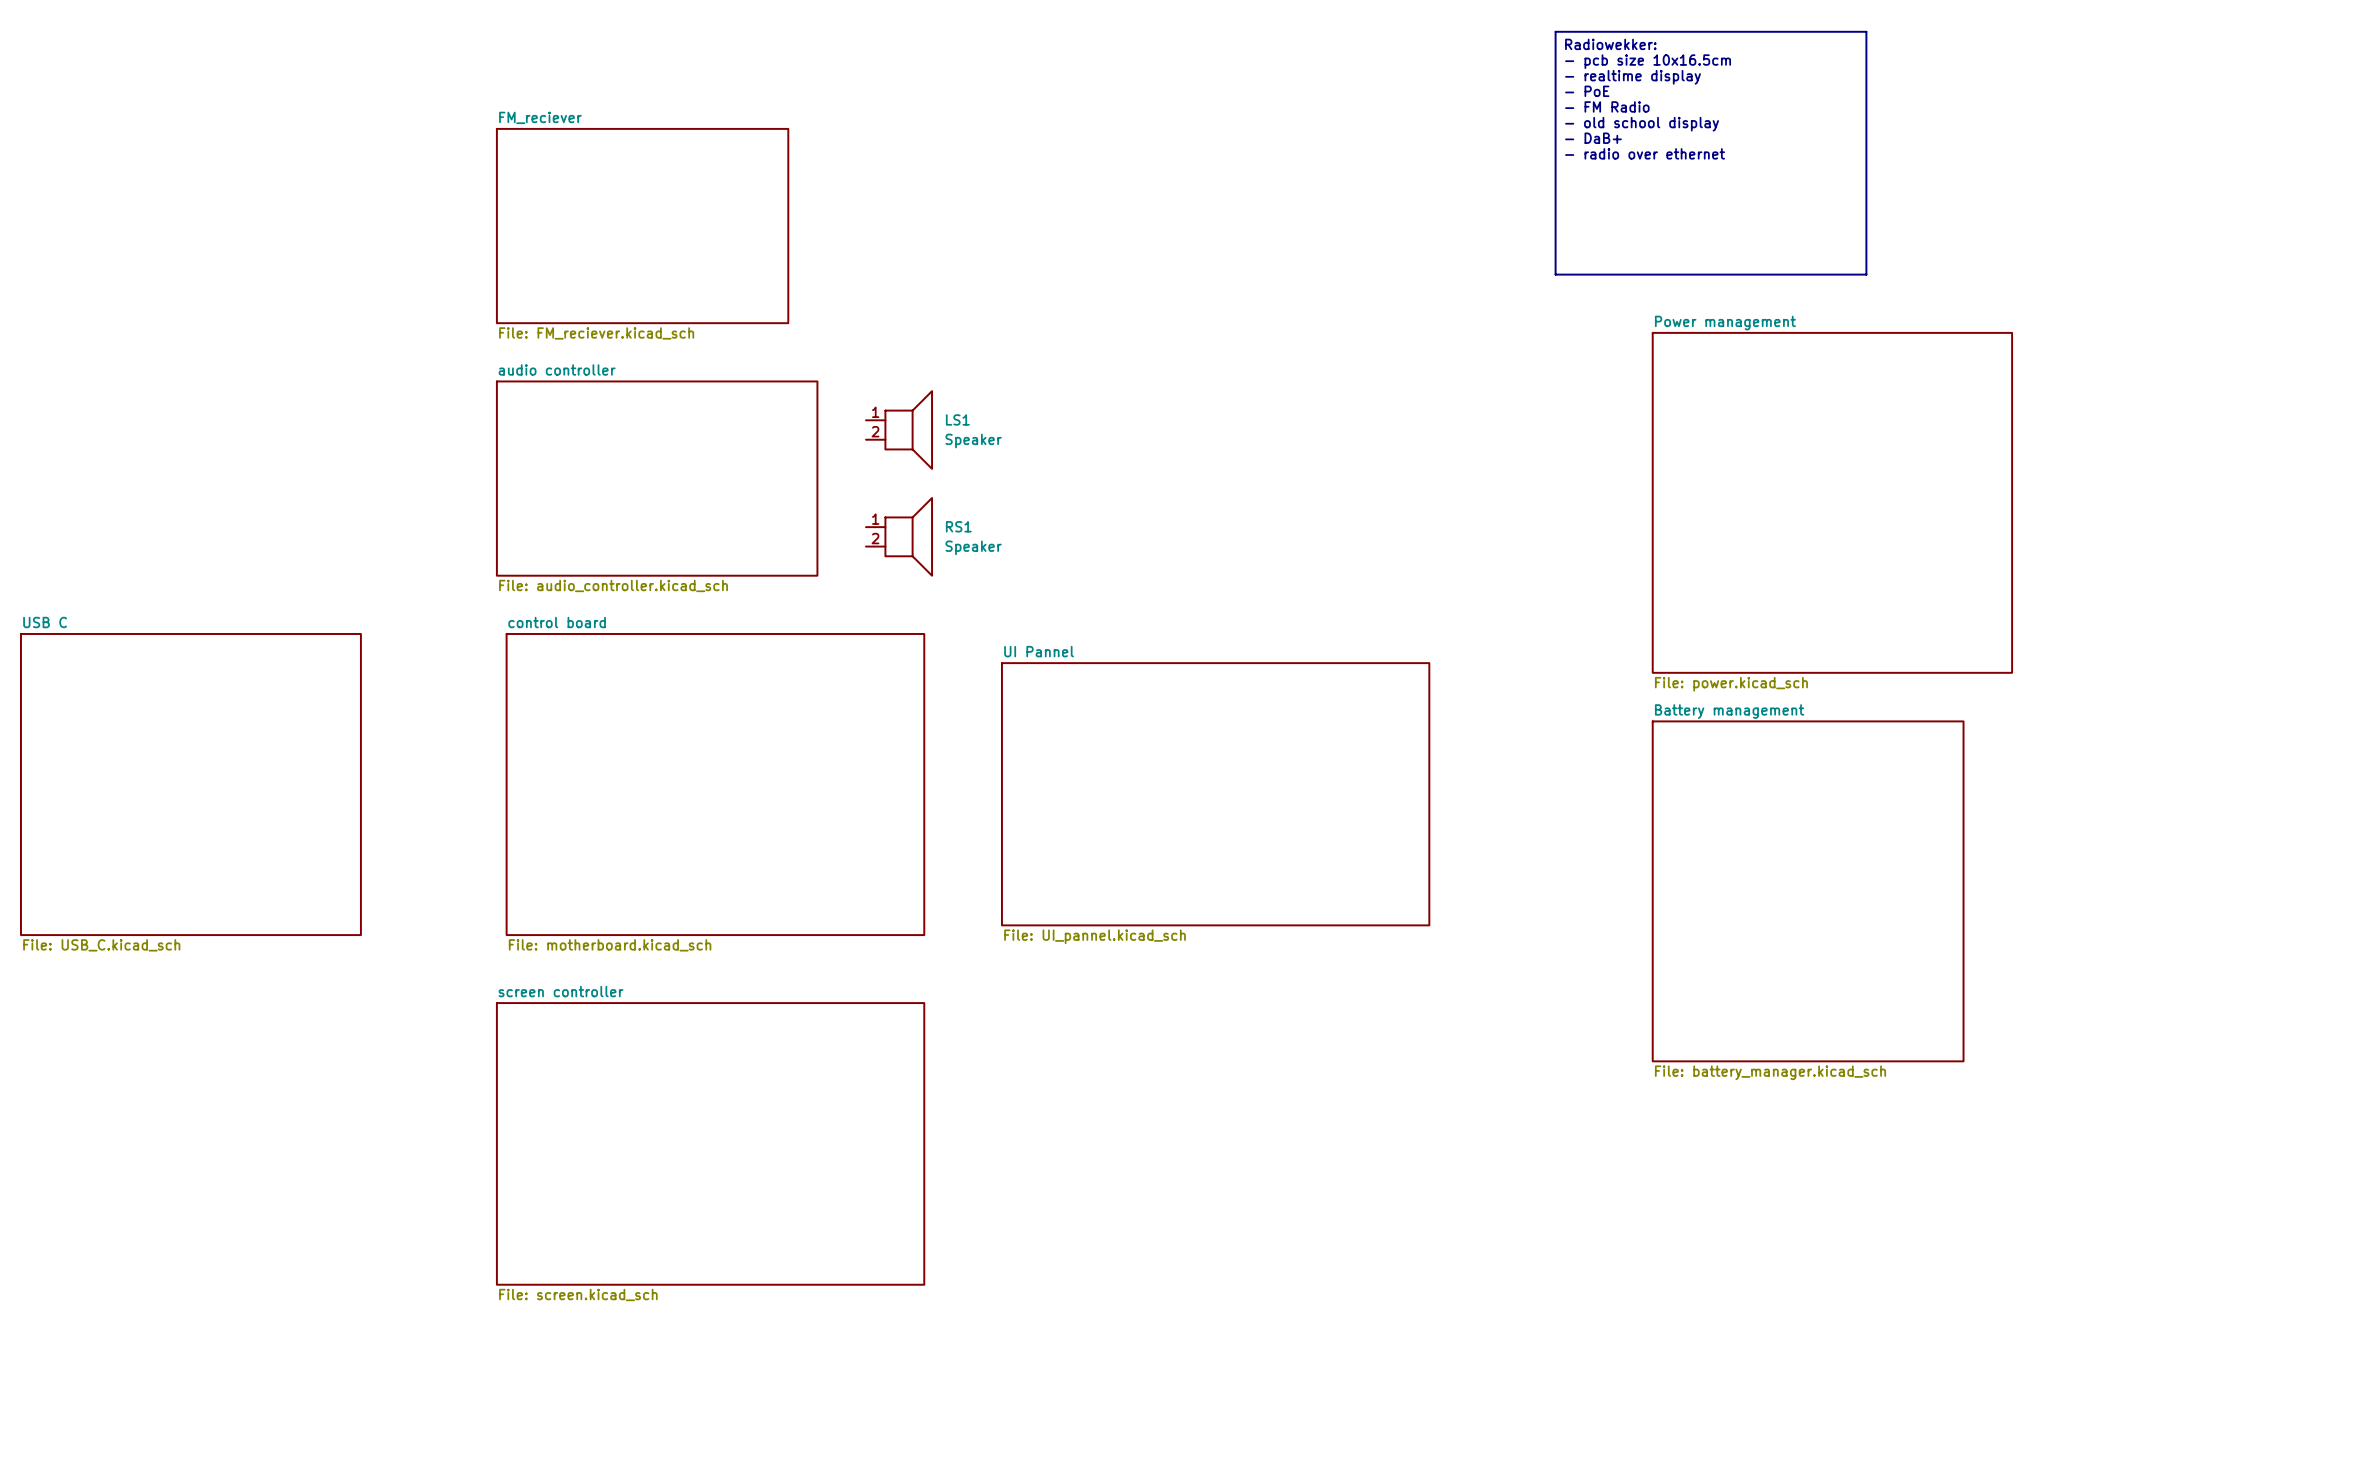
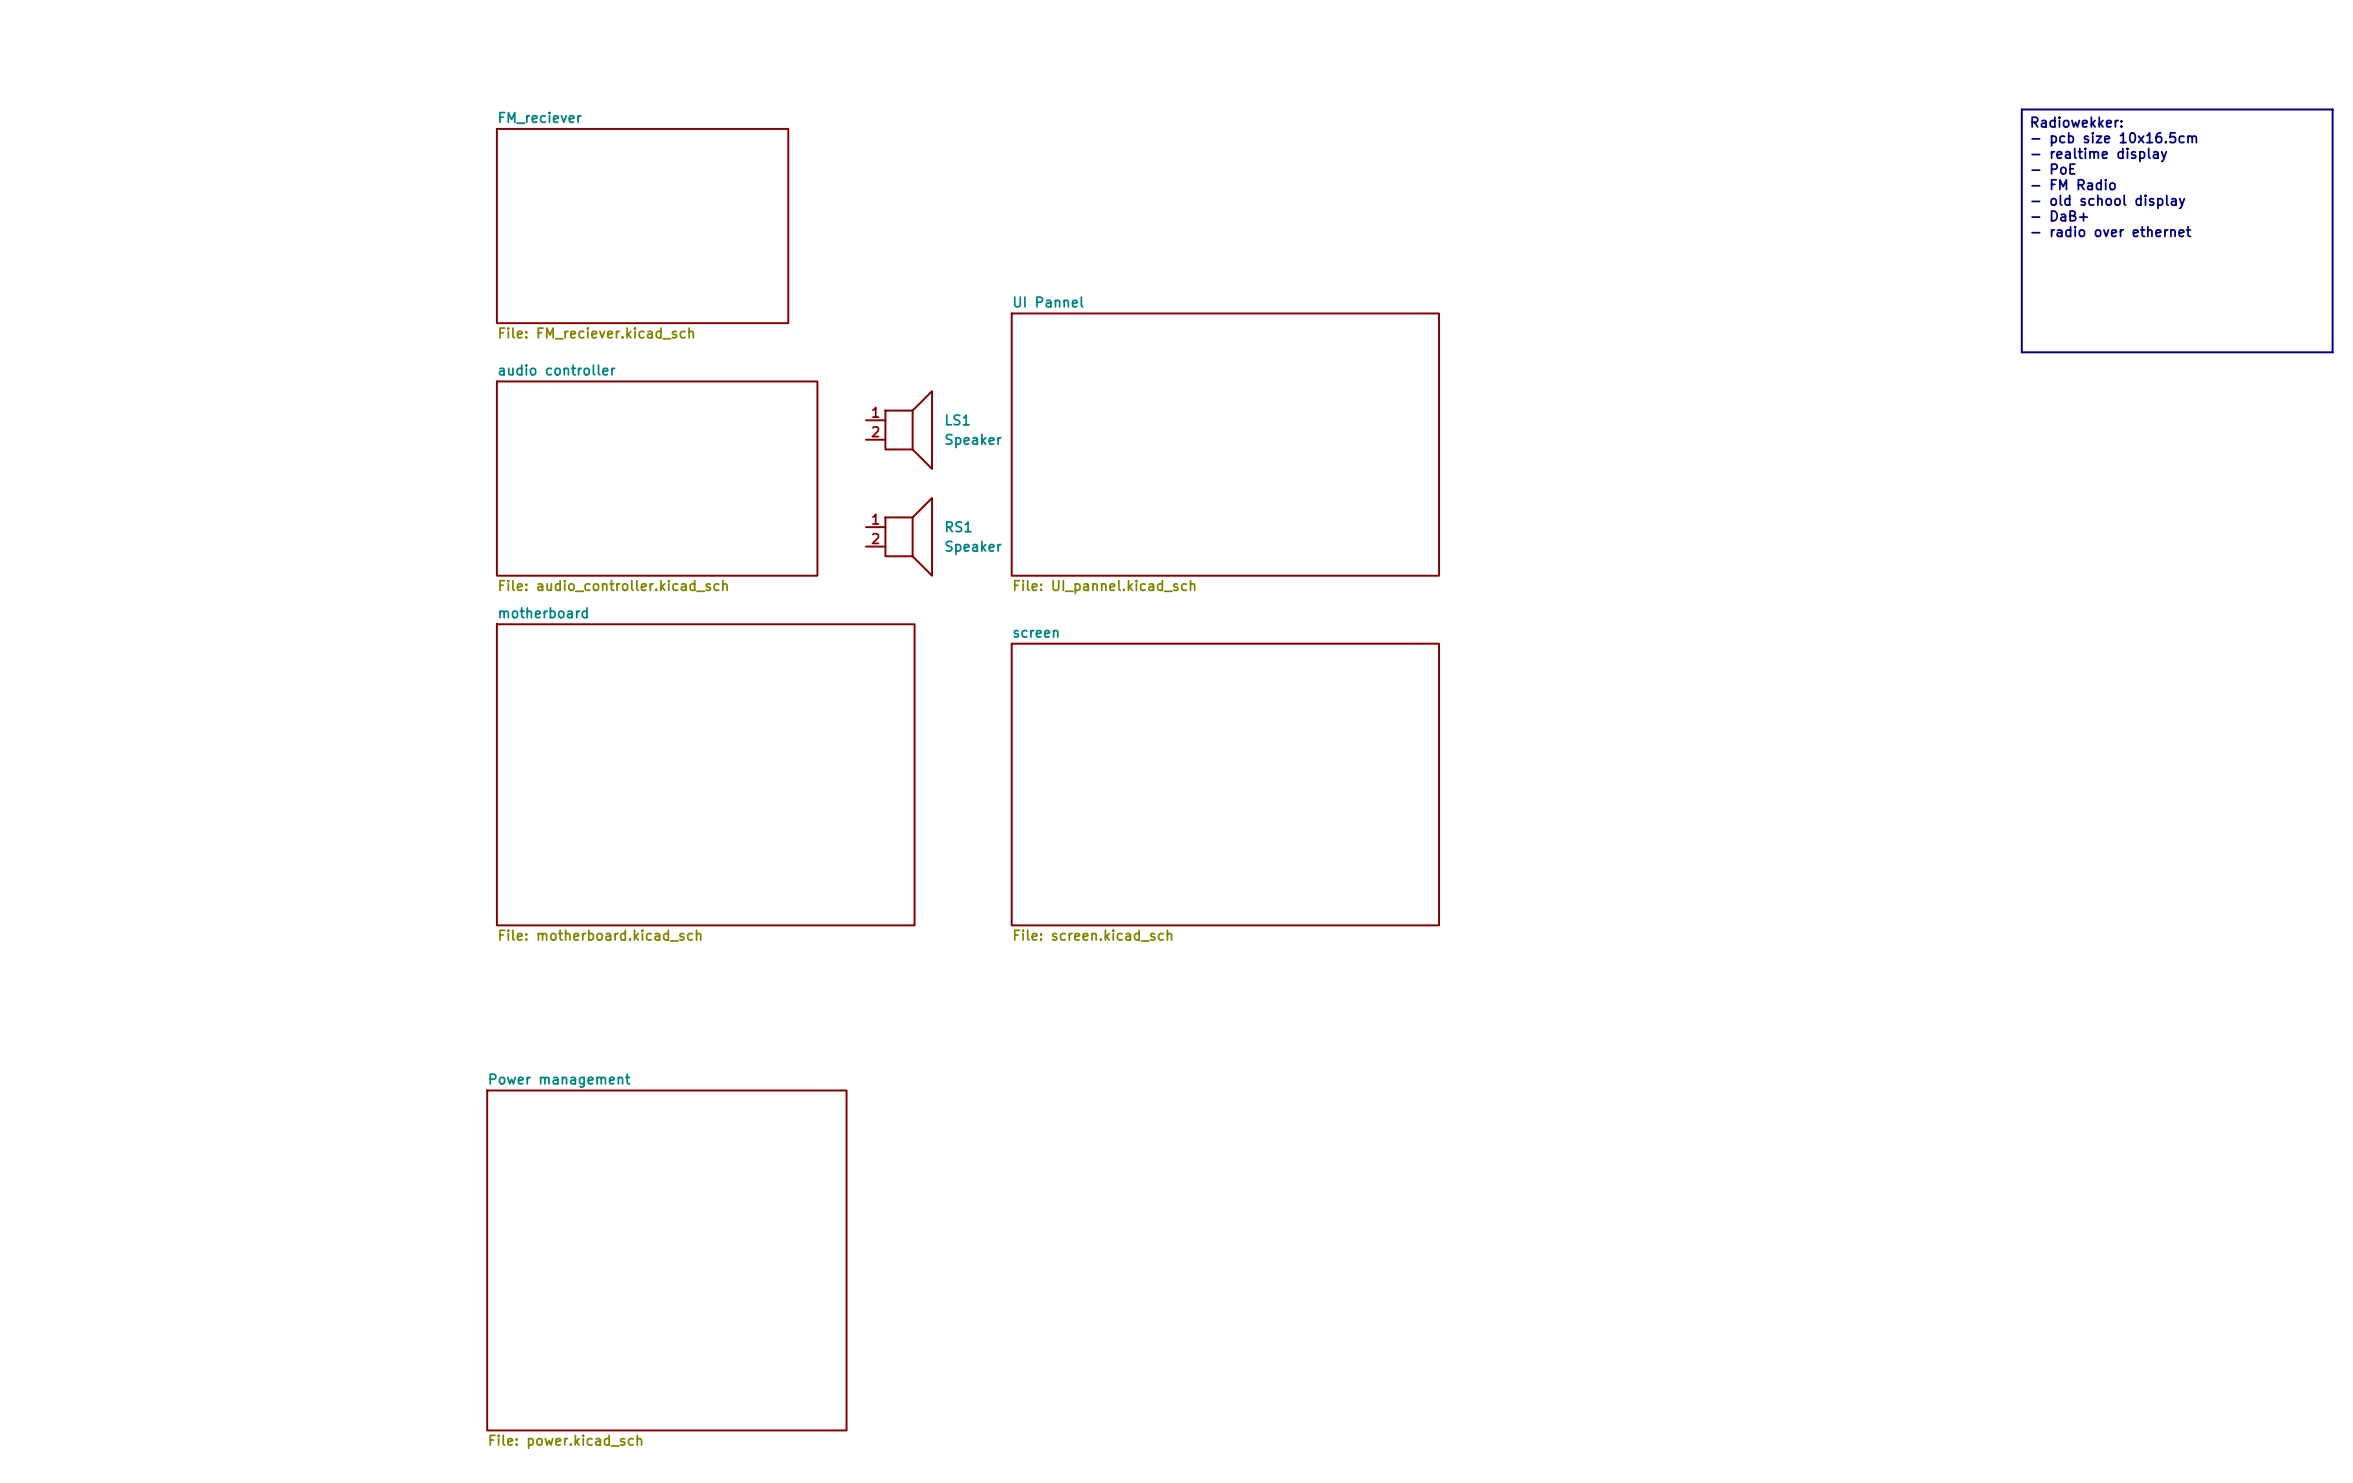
line: (1555, 31) (1866, 31) (1866, 274) (1555, 274) (1555, 31) -> none
text: Radiowekker: (1610, 44) -> none
text: - pcb size 10x16.5cm (1648, 61) -> none
text: - realtime display (1633, 77) -> none
text: - PoE (1587, 91) -> none
text: - FM Radio (1607, 106) -> none
line: none -> (2021, 109) (2332, 109) (2332, 352) (2021, 352) (2021, 109)
text: none -> Radiowekker: (2077, 122)
text: - old school display (1642, 124) -> none
text: - DaB+ (1593, 138) -> none
text: none -> - pcb size 10x16.5cm (2114, 139)
text: - radio over ethernet (1645, 153) -> none
text: none -> - realtime display (2099, 154)
text: none -> - PoE (2053, 169)
text: none -> - FM Radio (2073, 184)
text: none -> - old school display (2108, 201)
text: none -> - DaB+ (2059, 215)
text: none -> - radio over ethernet (2111, 231)
sheet UI Pannel: none -> File: UI_pannel.kicad_sch (1225, 444)
sheet Power management: File: power.kicad_sch (1832, 502) -> none
sheet motherboard: none -> File: motherboard.kicad_sch (705, 774)
sheet USB C: File: USB_C.kicad_sch (190, 784) -> none
sheet control board: File: motherboard.kicad_sch (715, 784) -> none
sheet screen: none -> File: screen.kicad_sch (1225, 784)
sheet UI Pannel: File: UI_pannel.kicad_sch (1215, 794) -> none
sheet Battery management: File: battery_manager.kicad_sch (1808, 891) -> none
sheet screen controller: File: screen.kicad_sch (710, 1143) -> none
sheet Power management: none -> File: power.kicad_sch (666, 1260)

